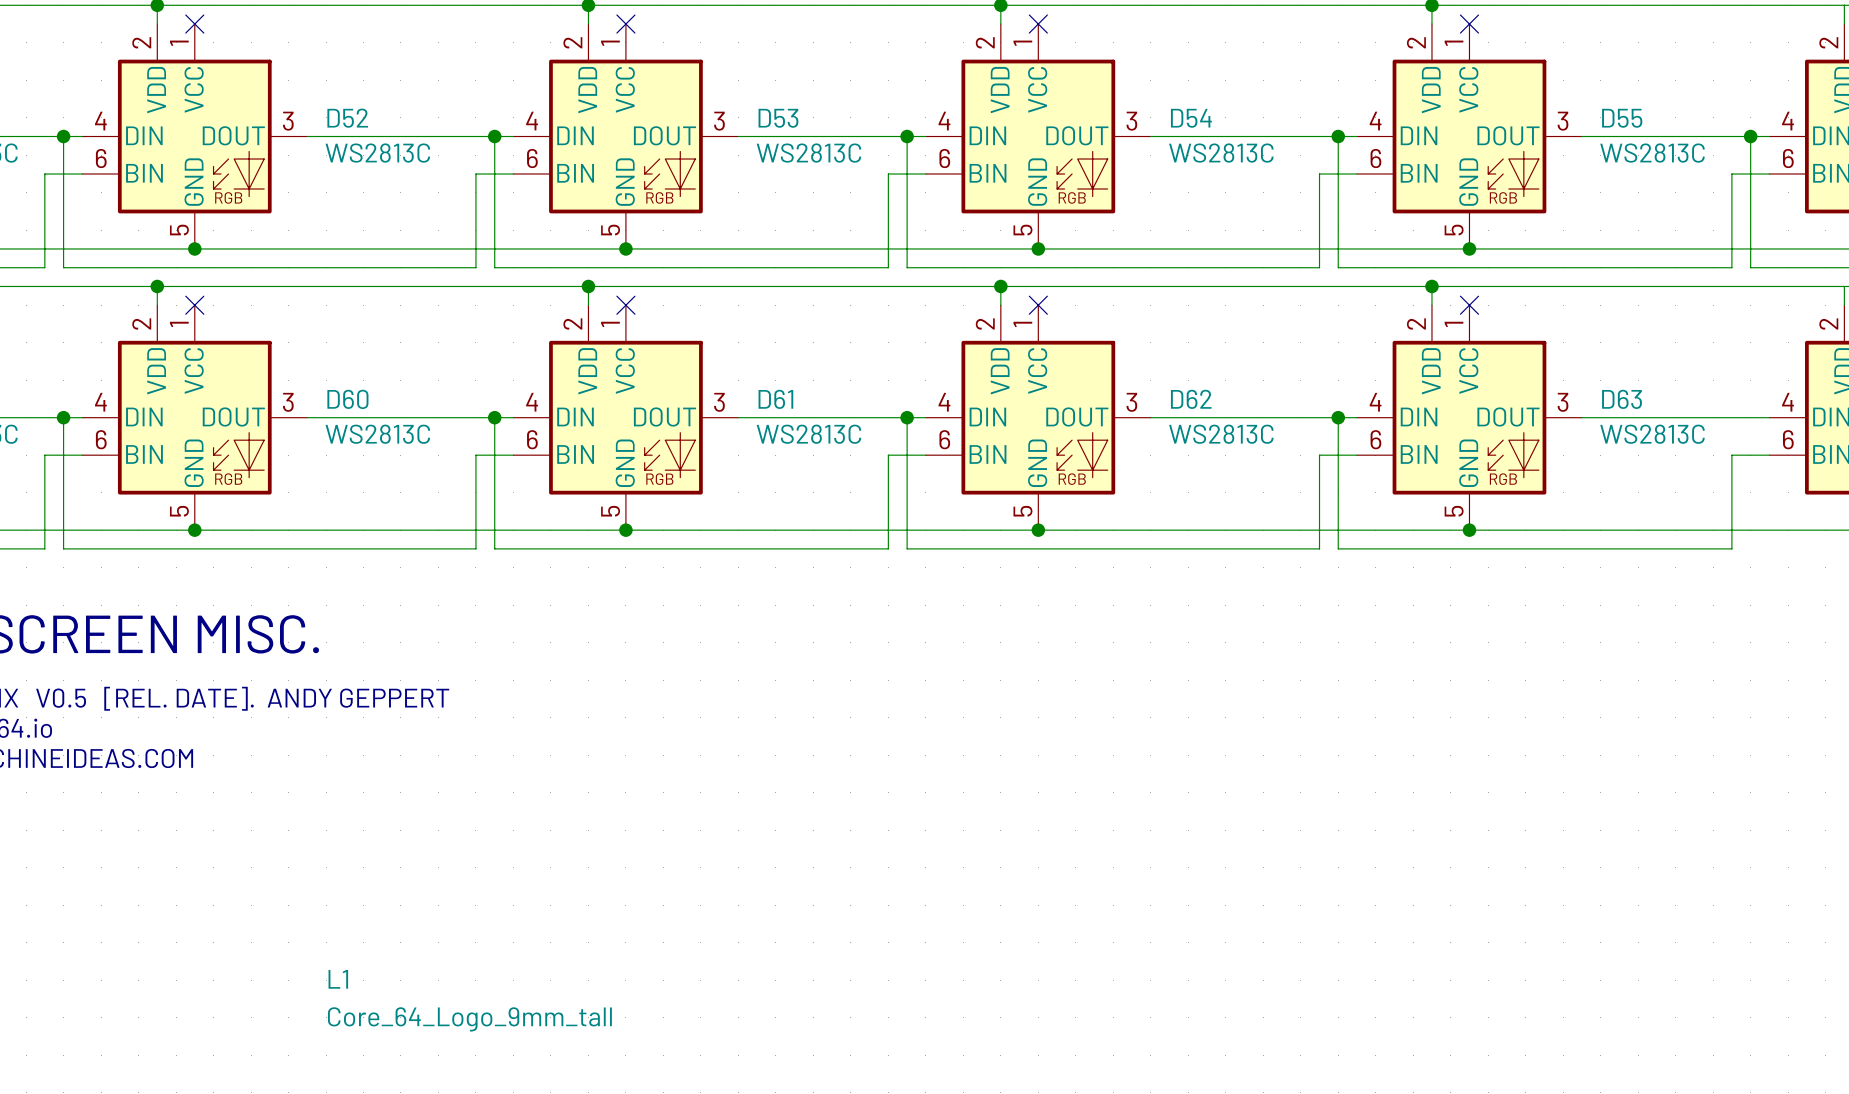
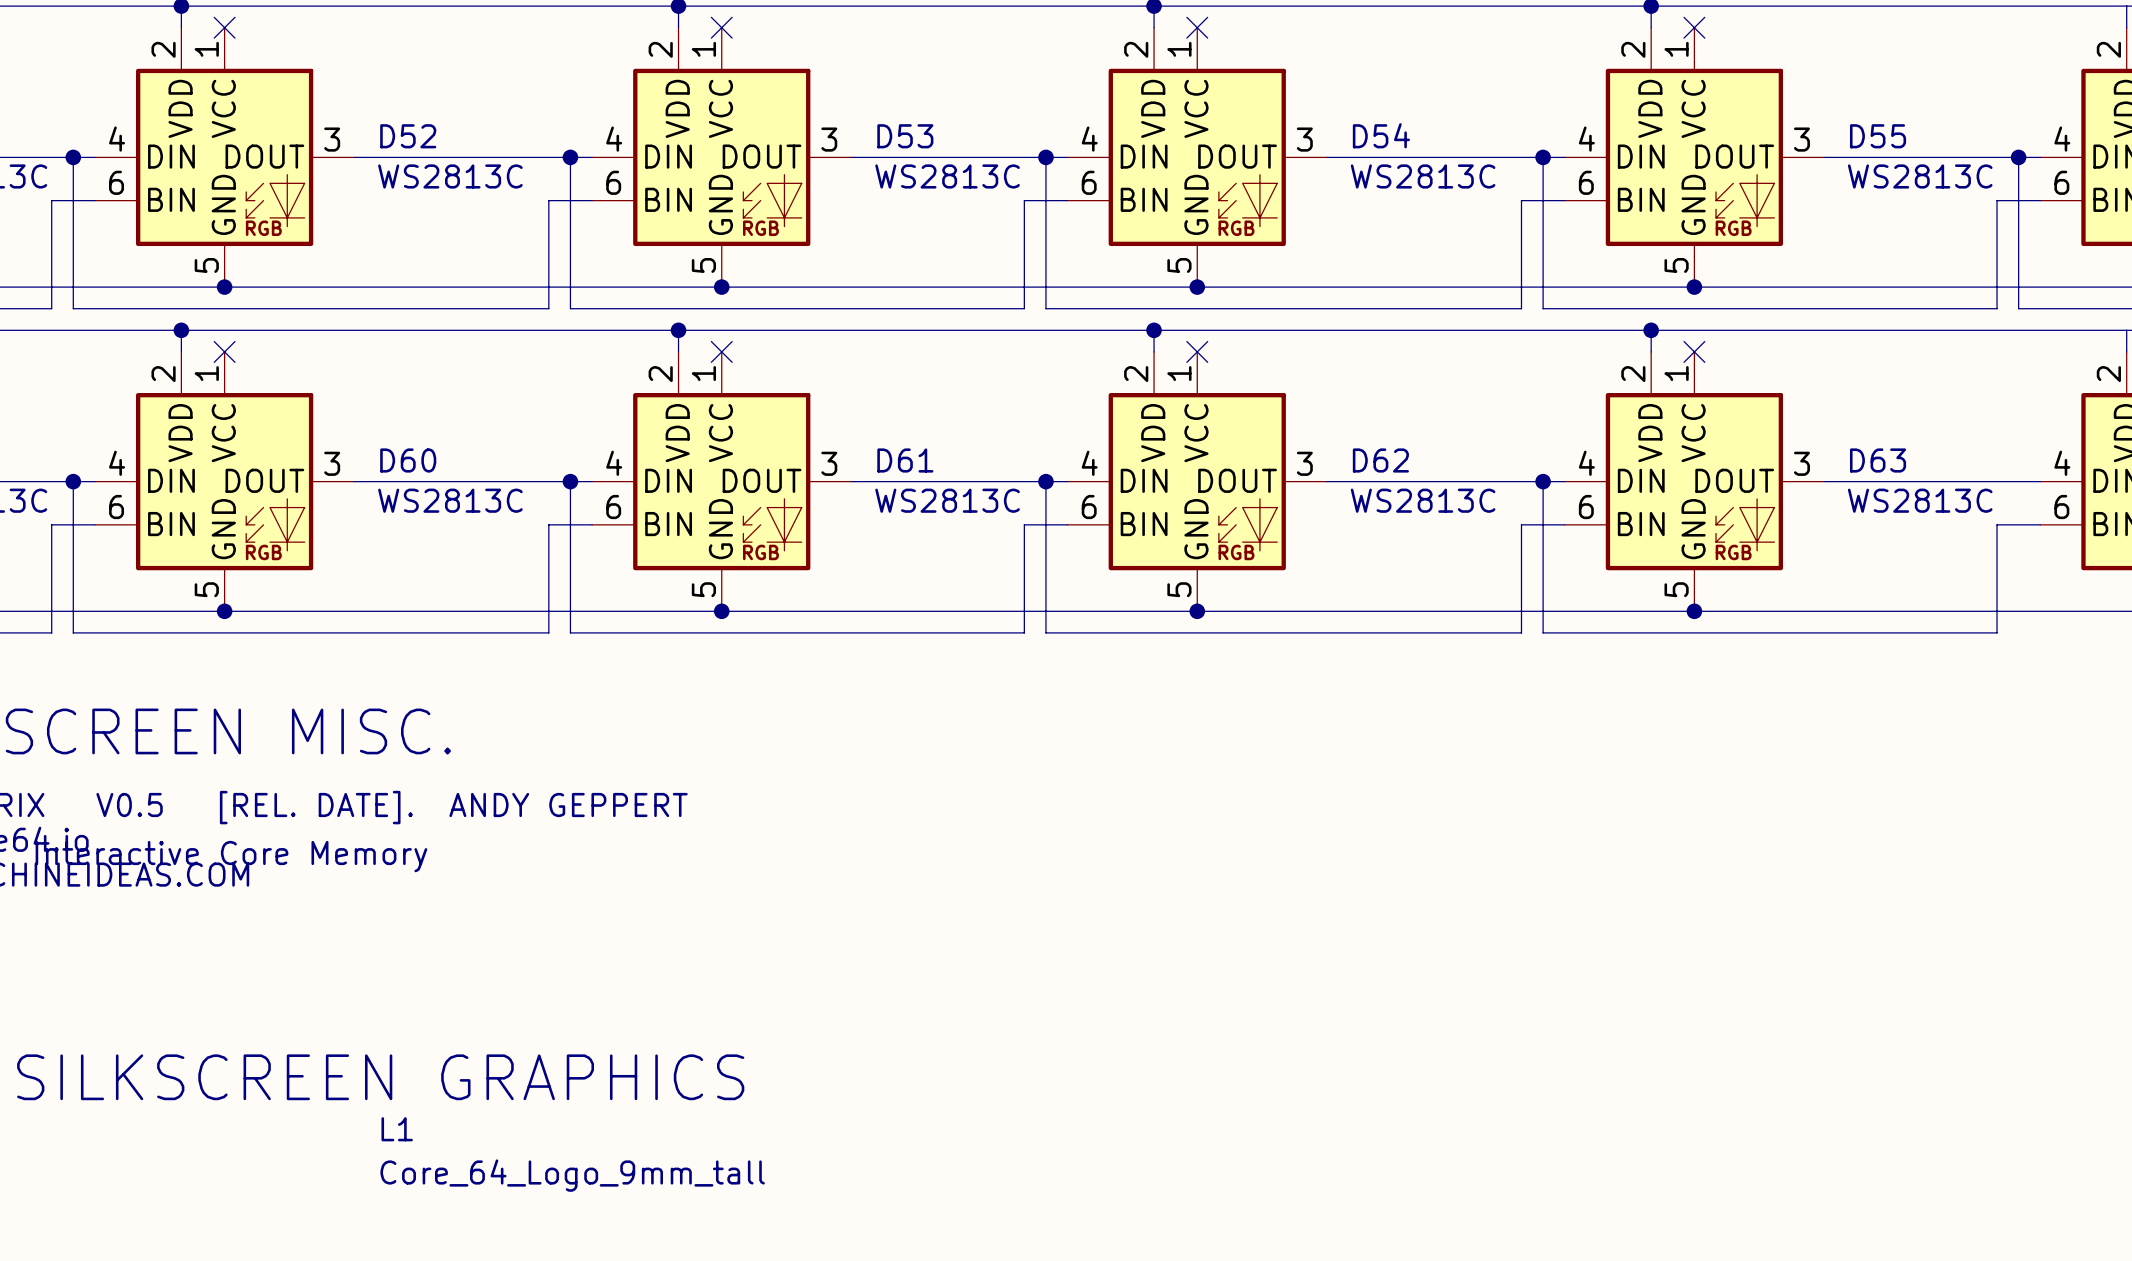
text: none -> Interactive Core Memory (231, 856)
text: none -> SILKSCREEN GRAPHICS (380, 1077)

